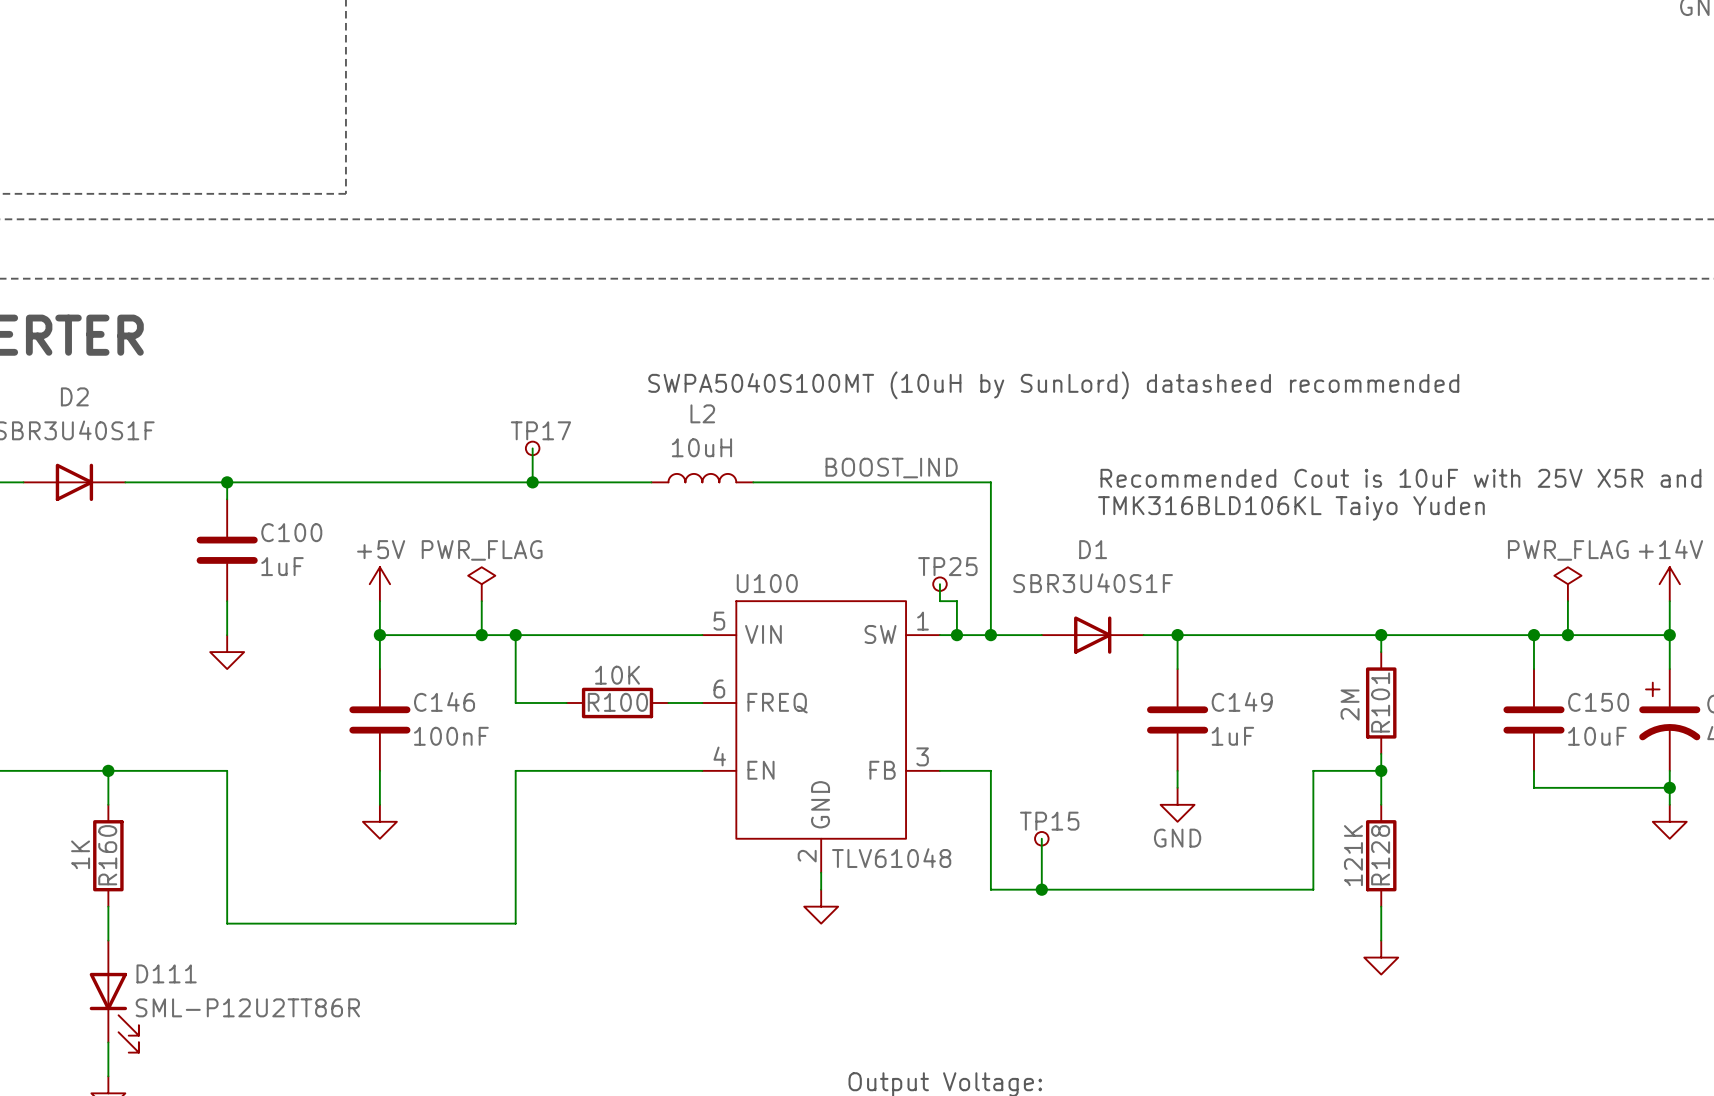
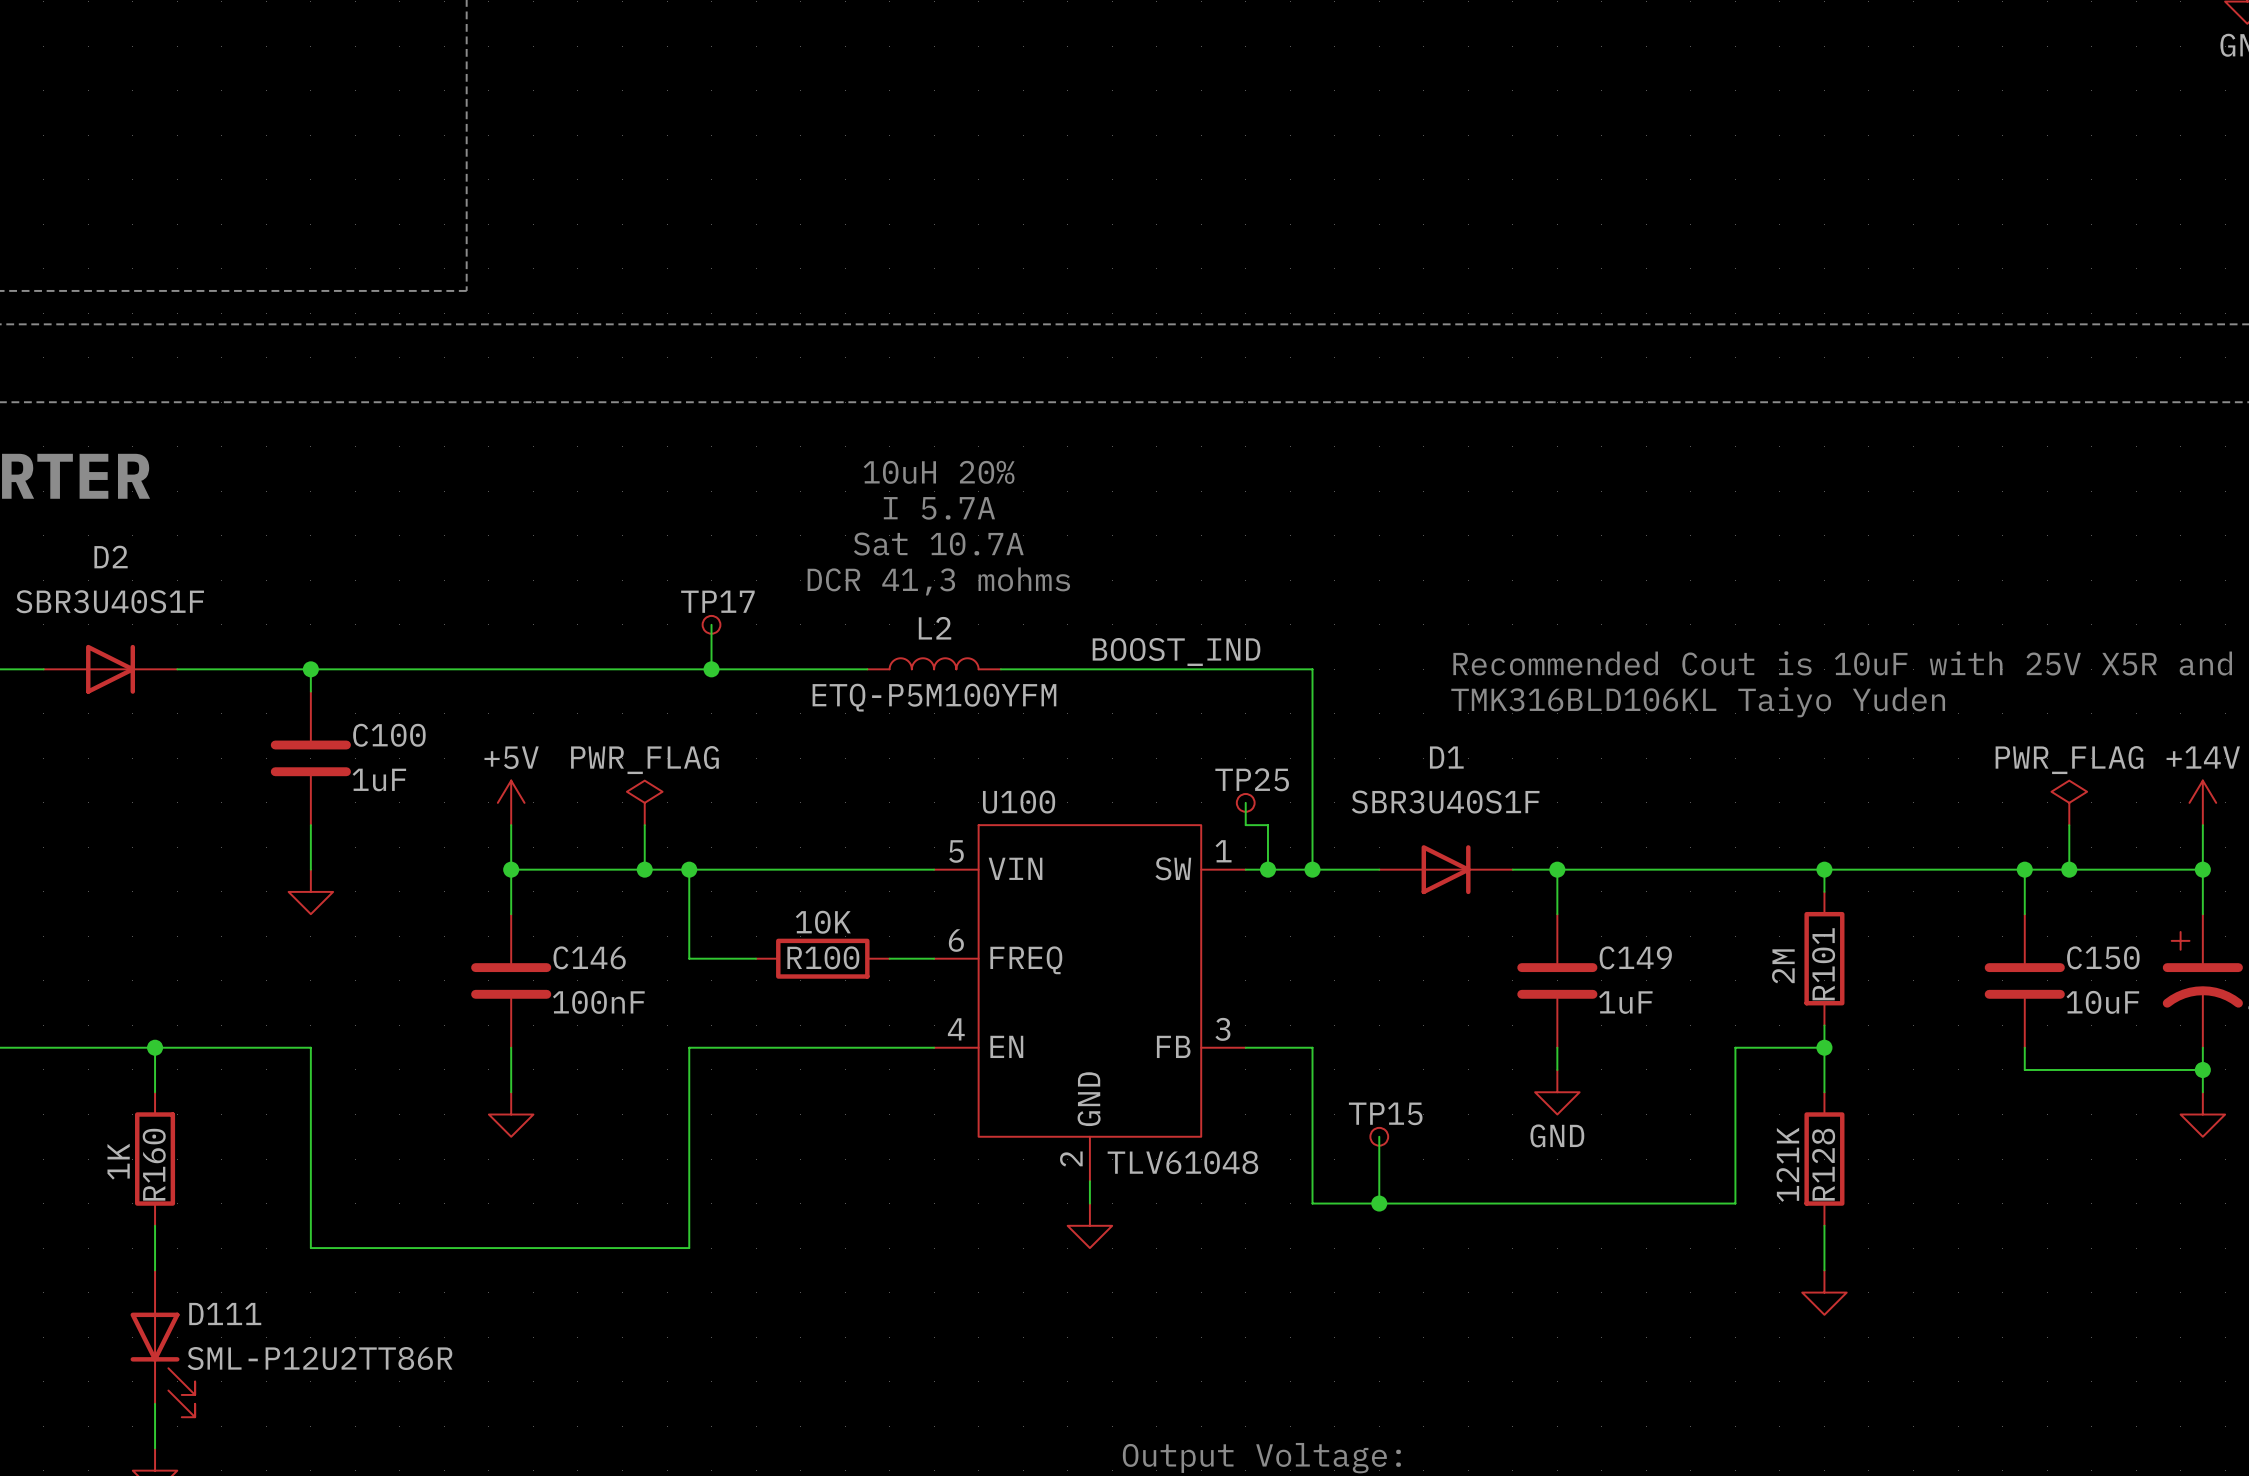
text: none -> 10uH 20% (939, 472)
text: none -> I 5.7A (939, 508)
text: SWPA5040S100MT (10uH by SunLord) datasheed recommended (1053, 385) -> none
text: none -> Sat 10.7A (938, 544)
L2 name position: L2 (702, 413) -> L2 (935, 628)
text: none -> DCR 41,3 mohms (938, 581)
L2 value: 10uH (701, 447) -> ETQ-P5M100YFM (934, 697)

